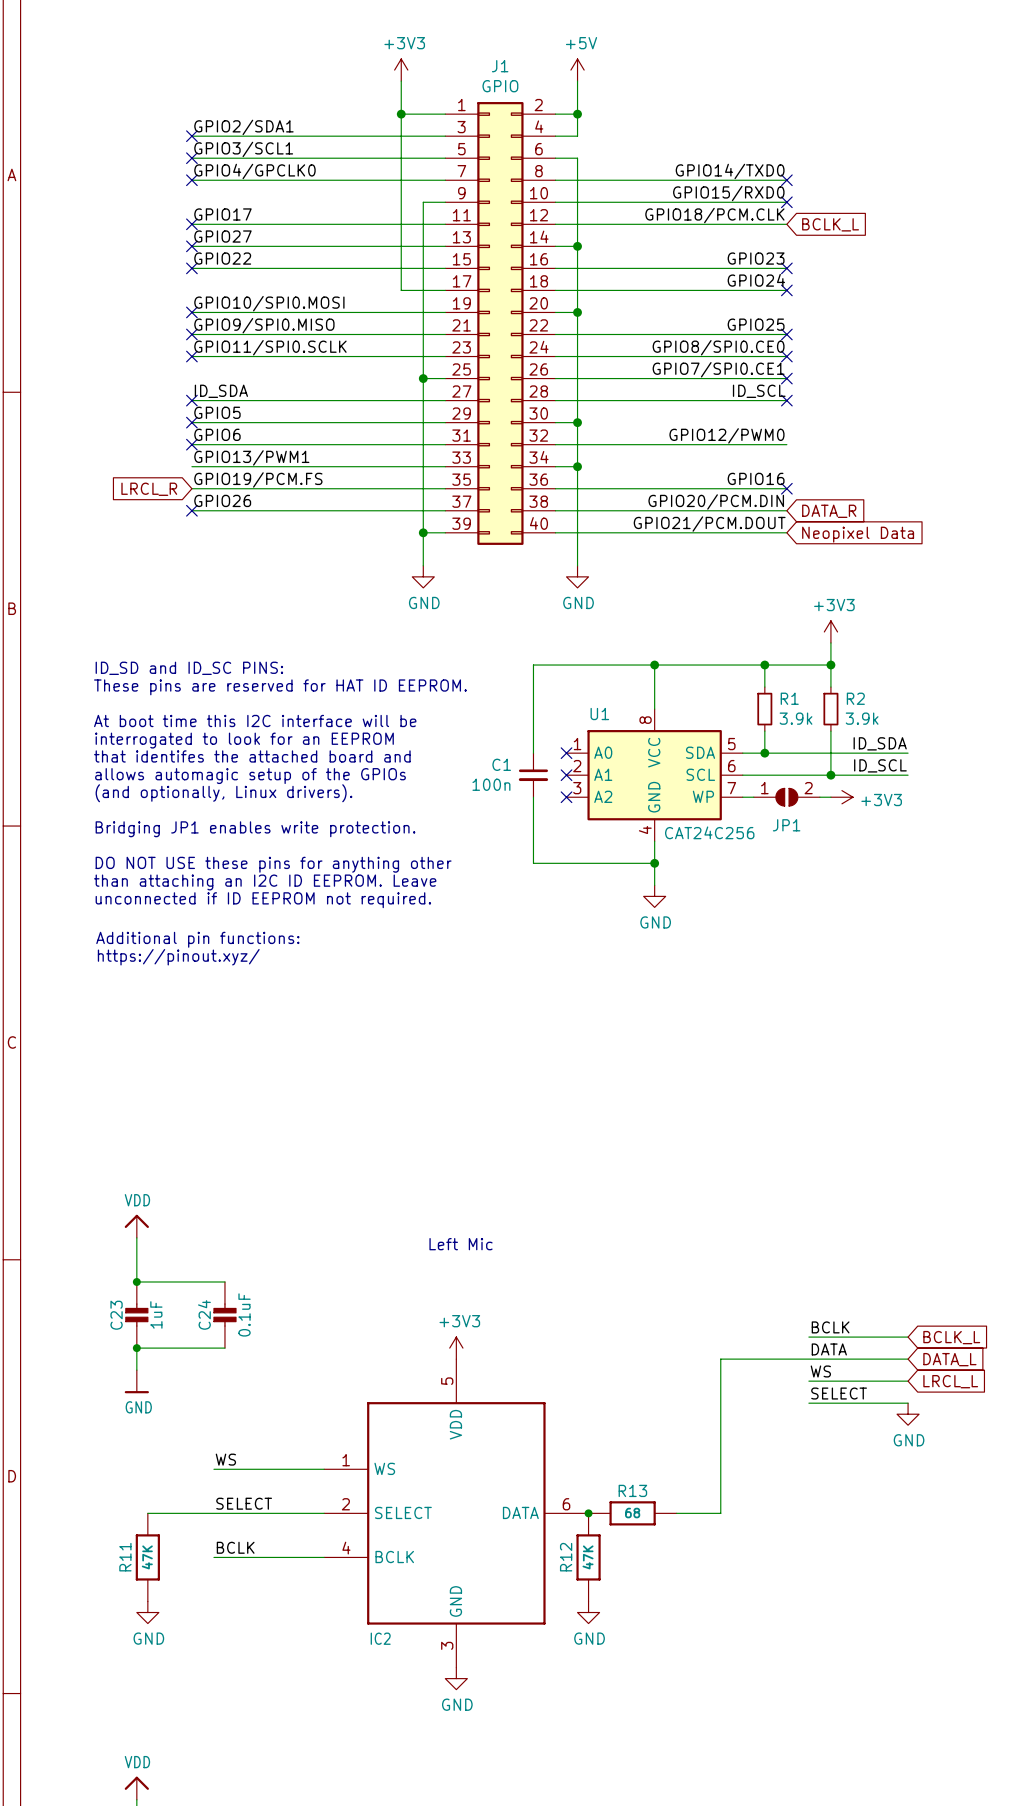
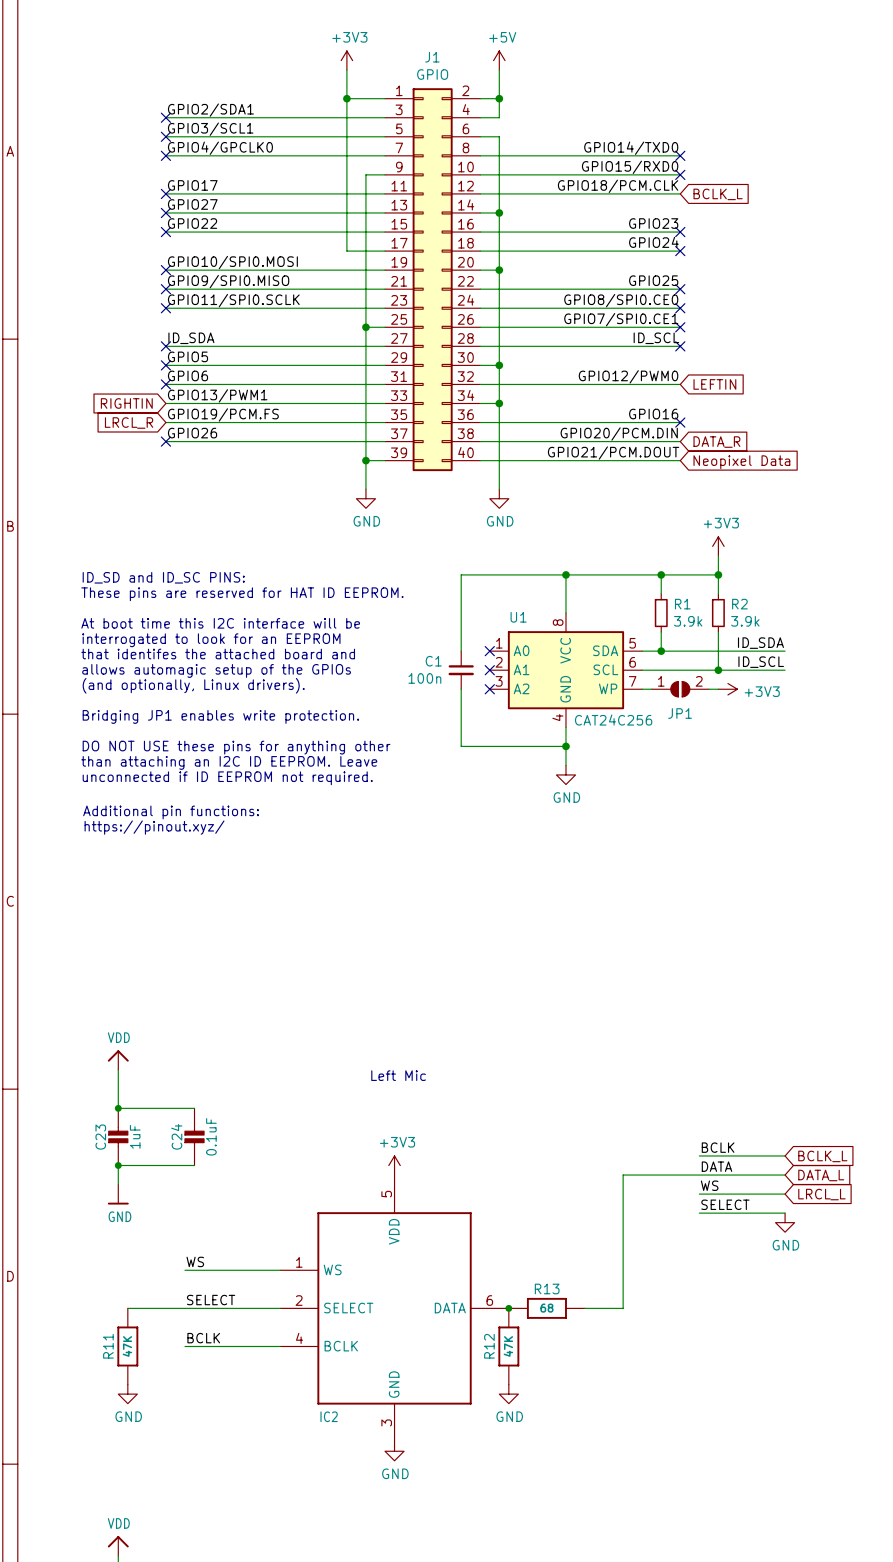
global label: none -> LEFTIN (714, 384)
global label: none -> RIGHTIN (126, 403)

